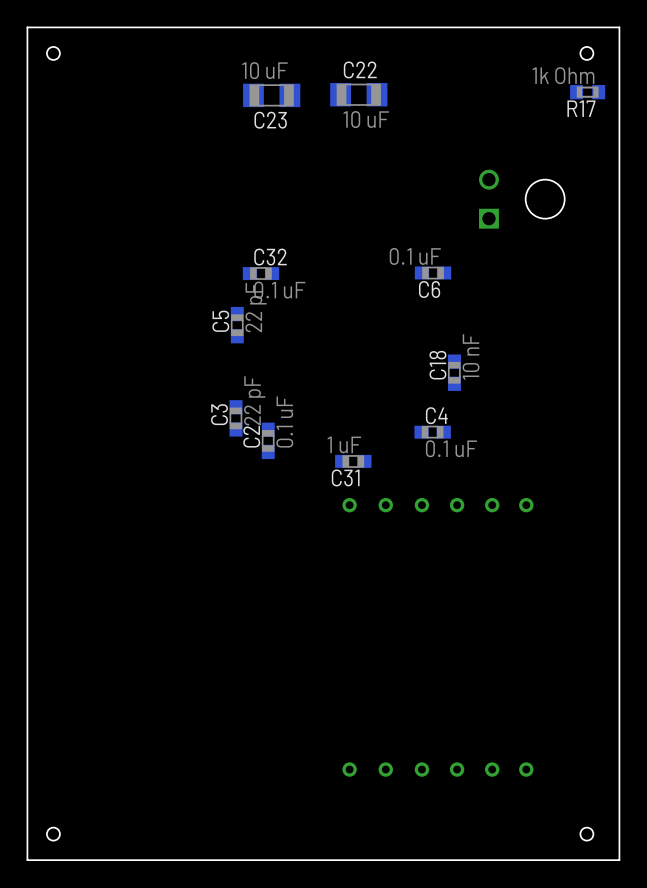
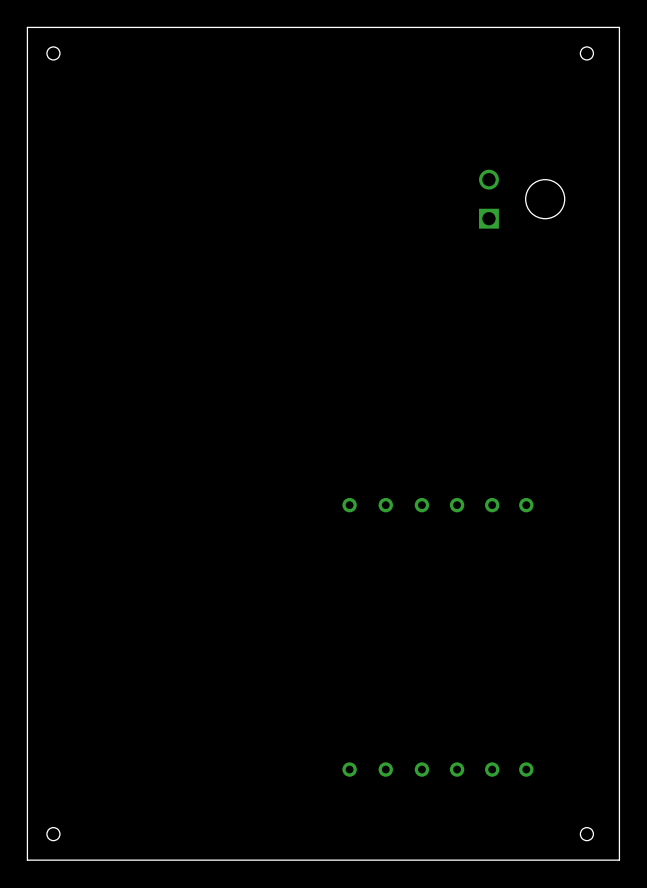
R17: 1k Ohm (587, 92) -> none
C22: 10 uF (358, 94) -> none
C23: 10 uF (271, 95) -> none
C6: 0.1 uF (433, 272) -> none
C32: 0.1 uF (261, 273) -> none
C5: 22 pF (237, 325) -> none
C18: 10 nF (454, 372) -> none
C3: 22 pF (236, 418) -> none
C4: 0.1 uF (432, 432) -> none
C2: 0.1 uF (268, 440) -> none
C31: 1 uF (353, 461) -> none

